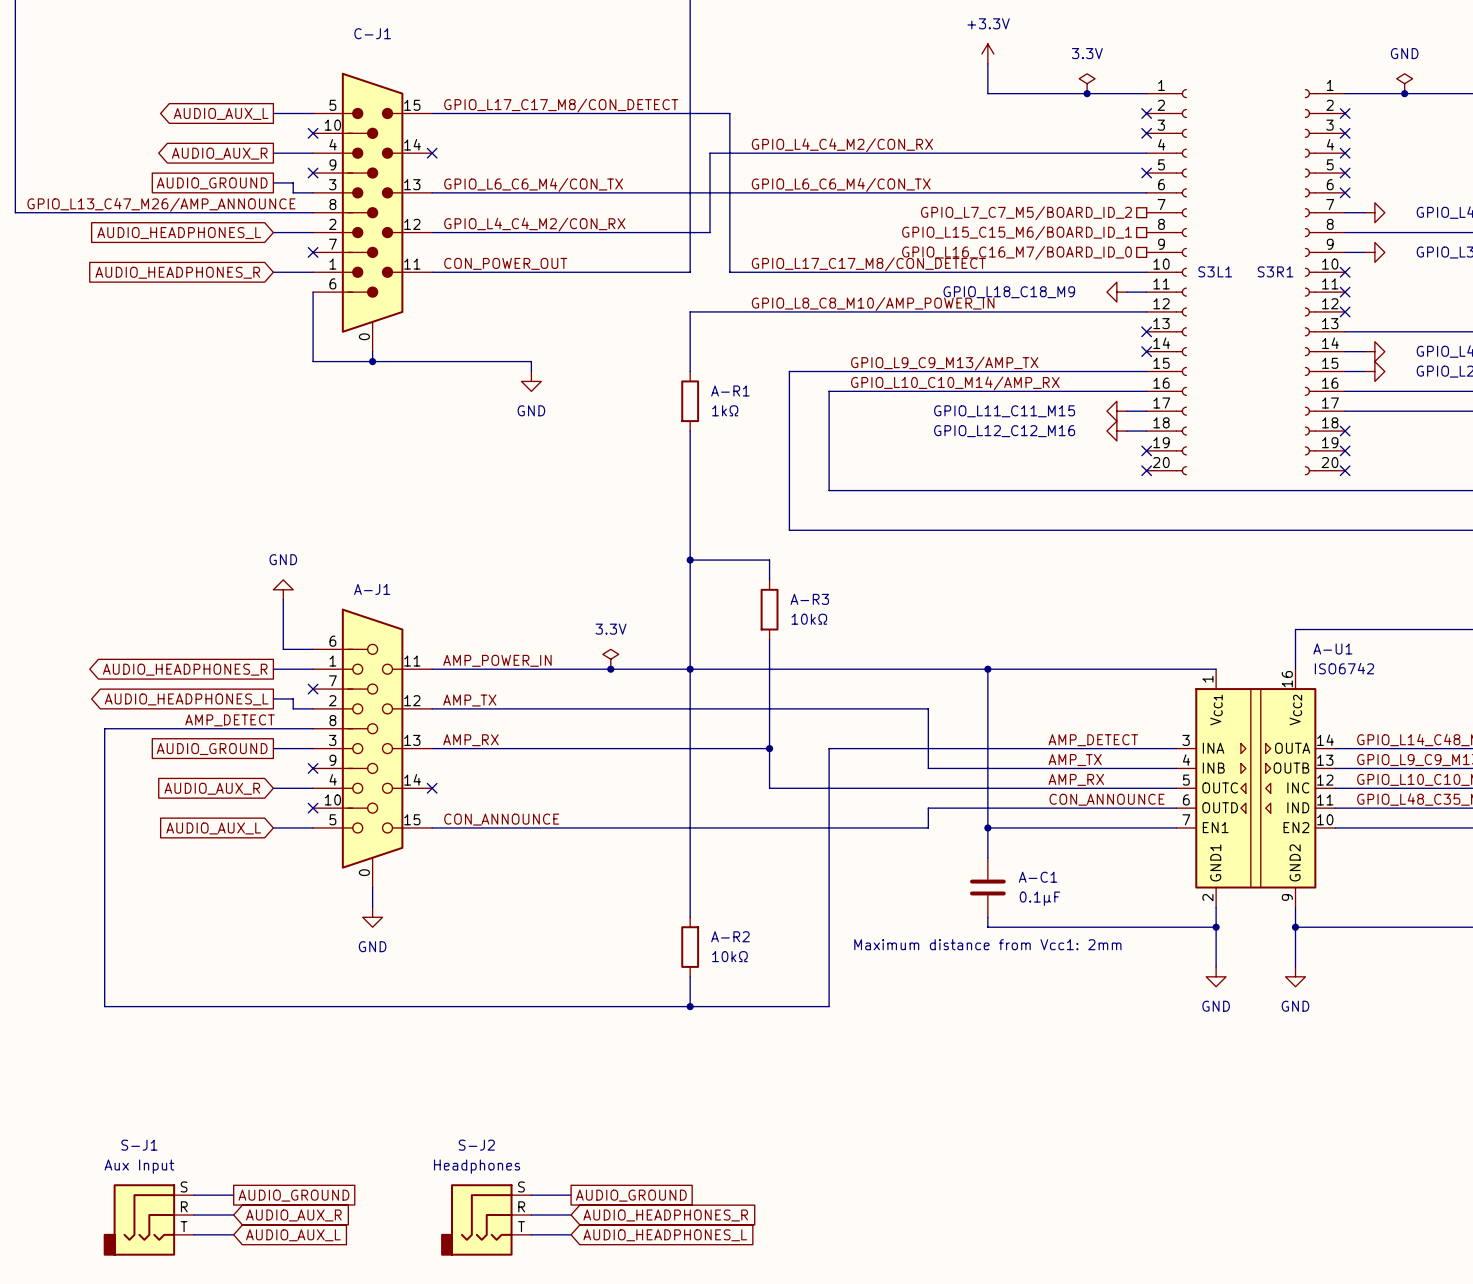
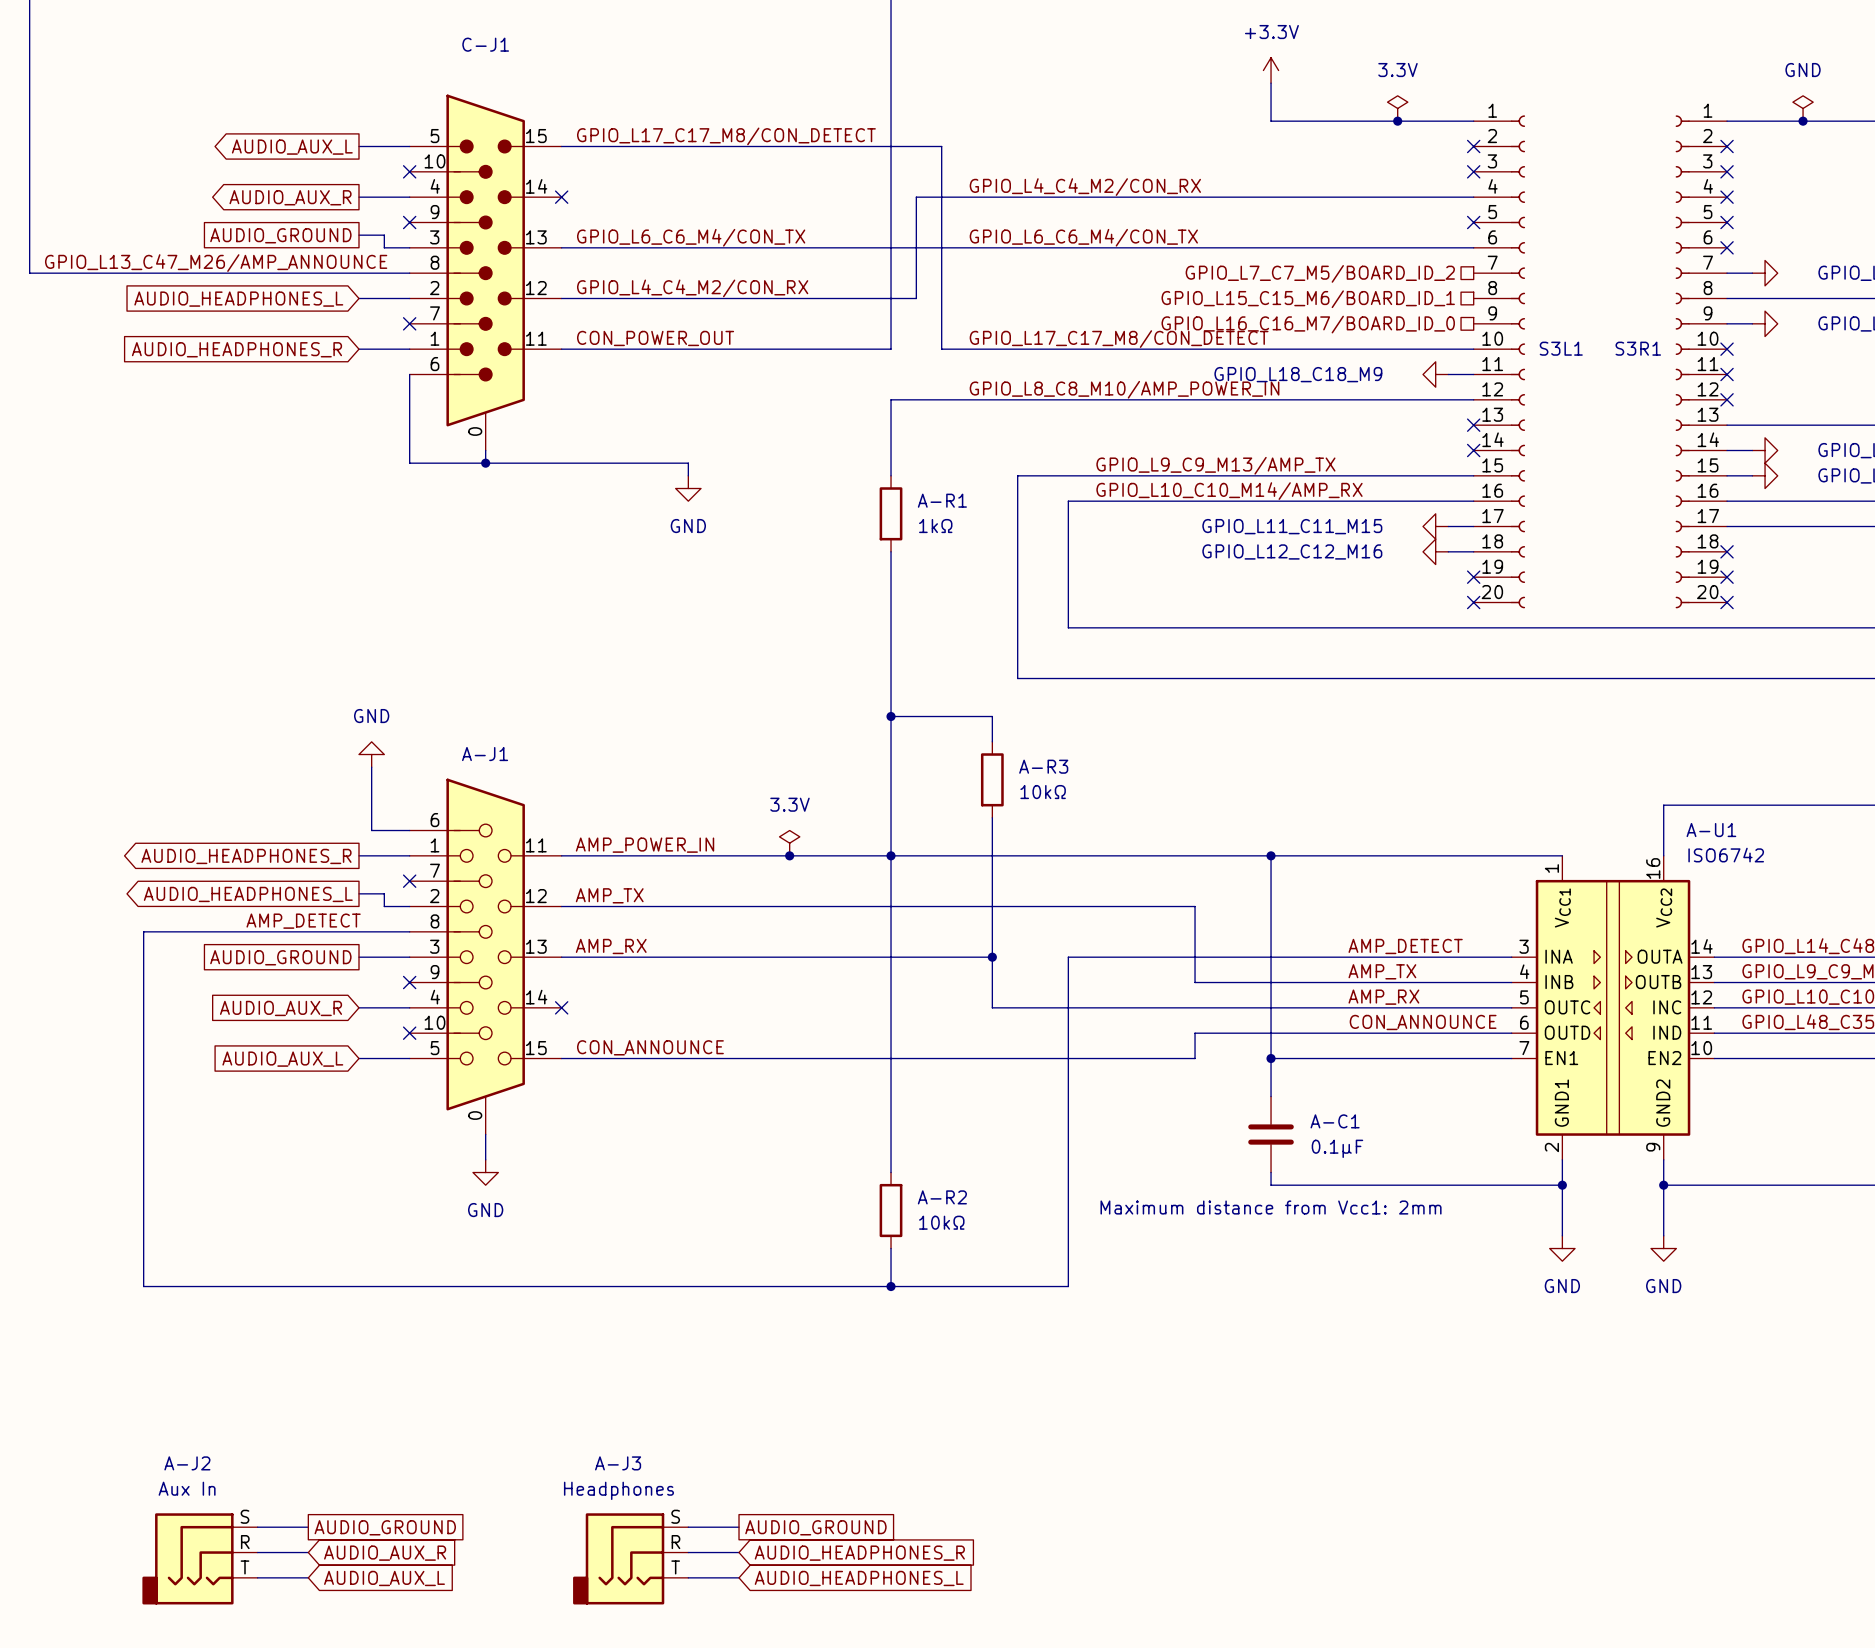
S-J1 name: S-J1 (139, 1145) -> A-J2 (187, 1463)
S-J2 name: S-J2 (476, 1145) -> A-J3 (618, 1463)
S-J1 value: Aux Input (139, 1166) -> Aux In (187, 1488)

